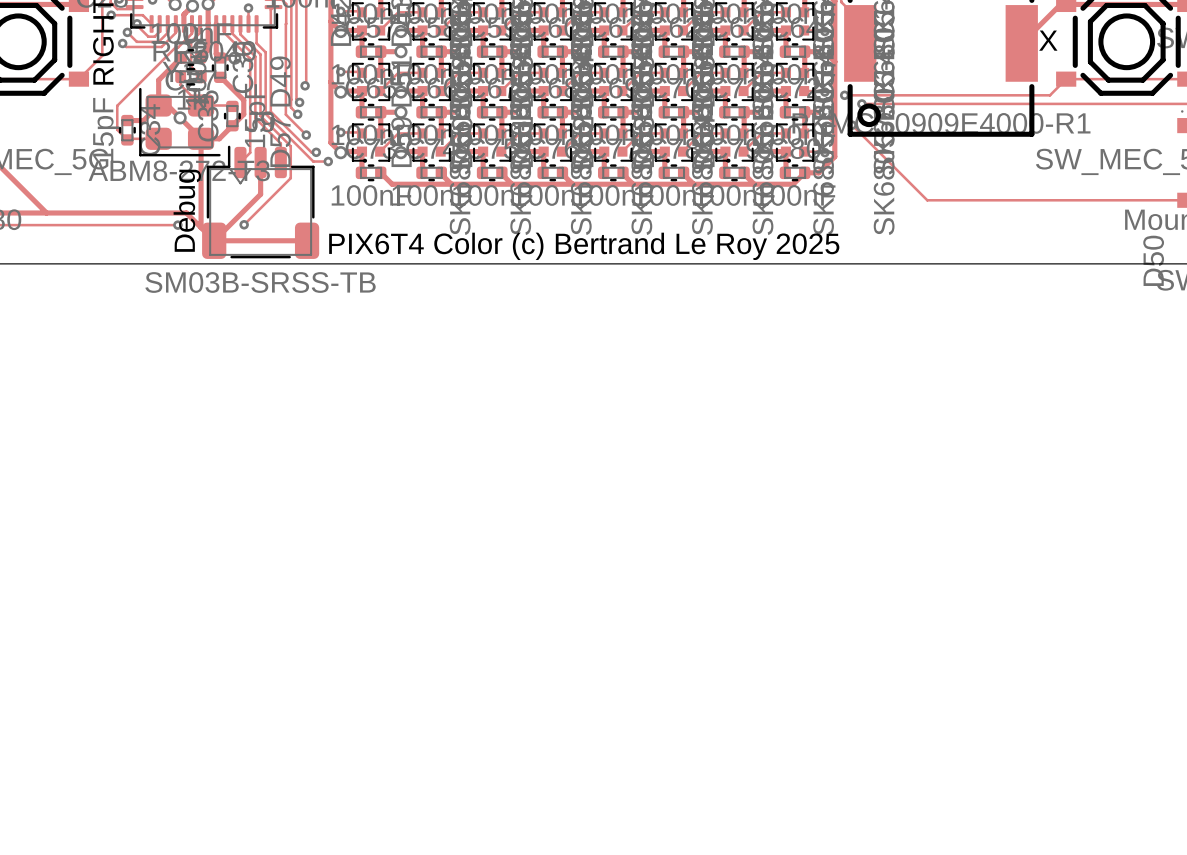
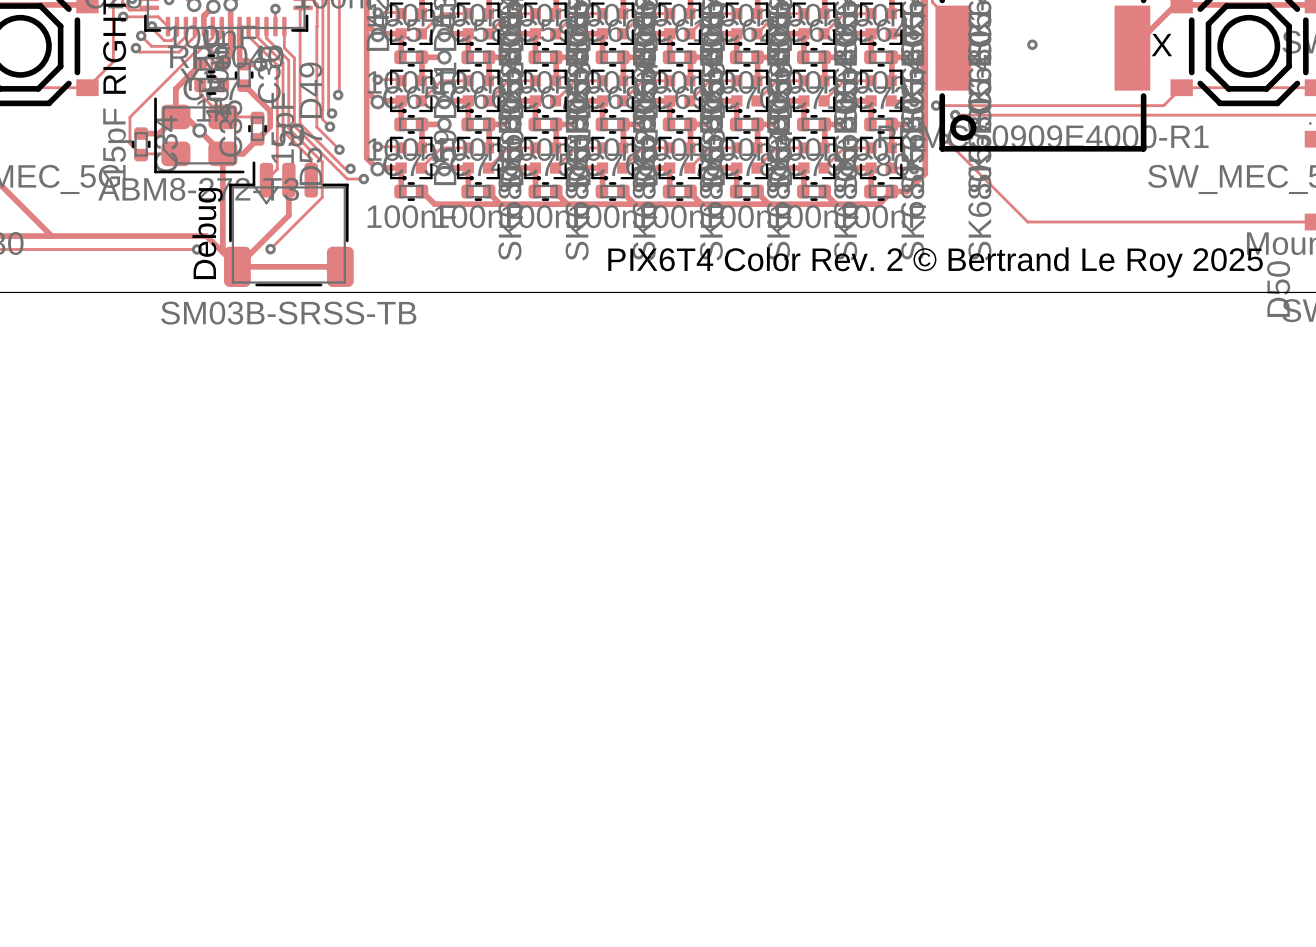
via: none -> (1032, 44)
text: none -> PIX6T4 Color Rev. 2 © Bertrand Le Roy 2025 (935, 262)
text: PIX6T4 Color (c) Bertrand Le Roy 2025 (584, 246) -> none

